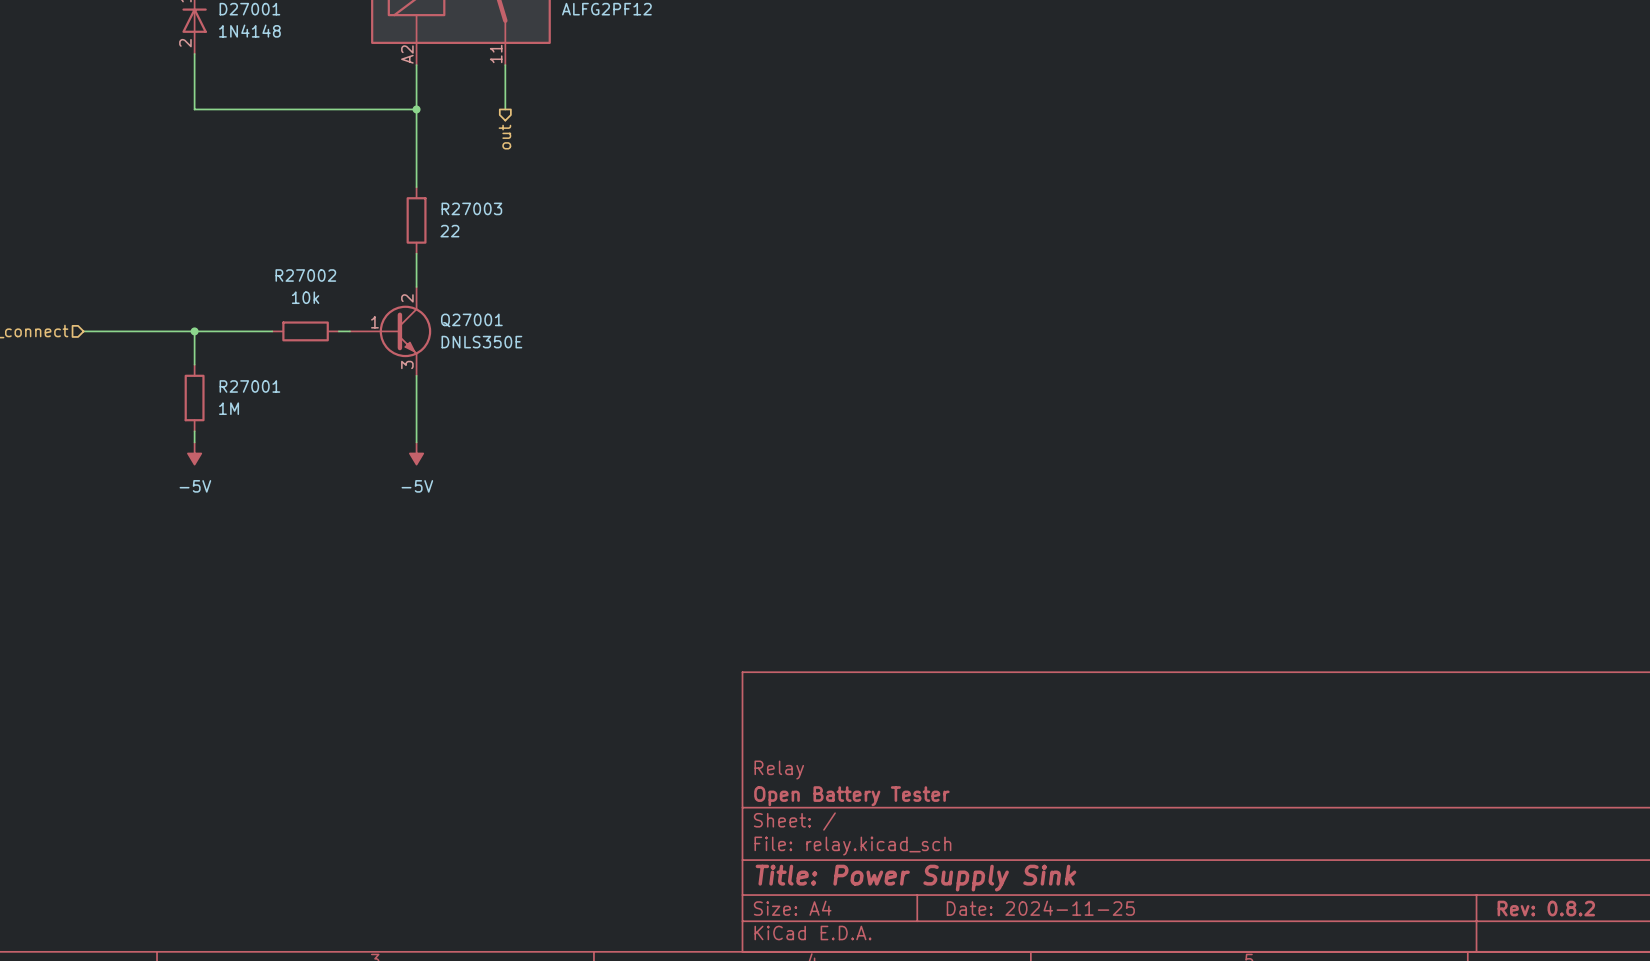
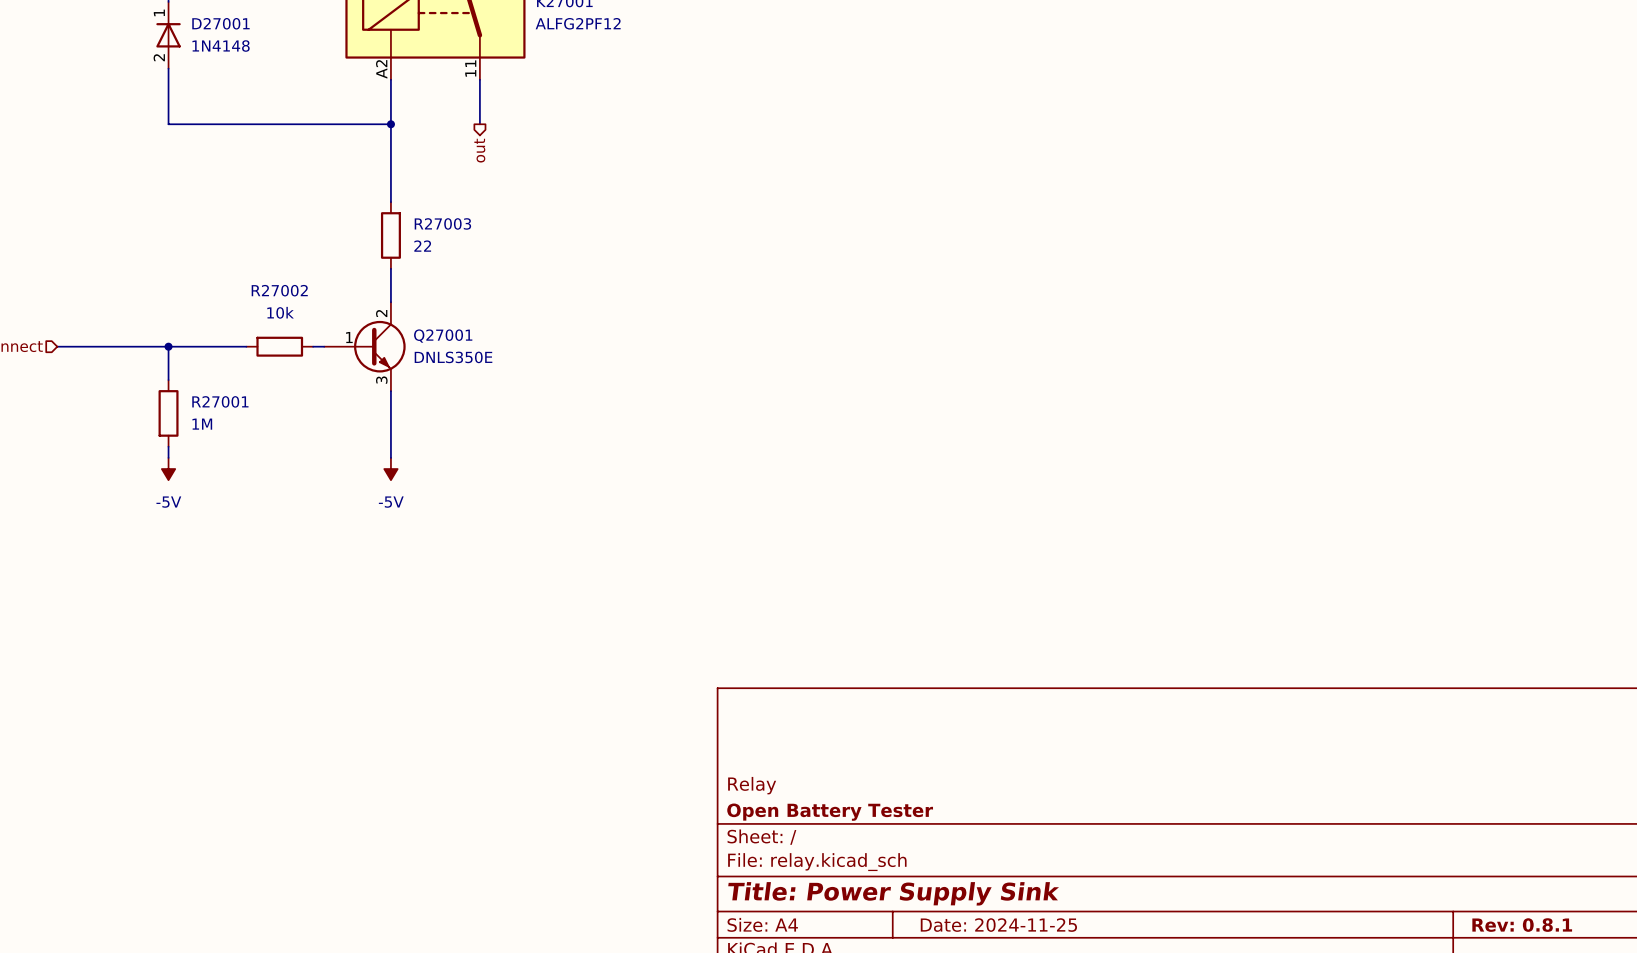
title block: Rev: 0.8.2 (1546, 908) -> Rev: 0.8.1 (1522, 925)

